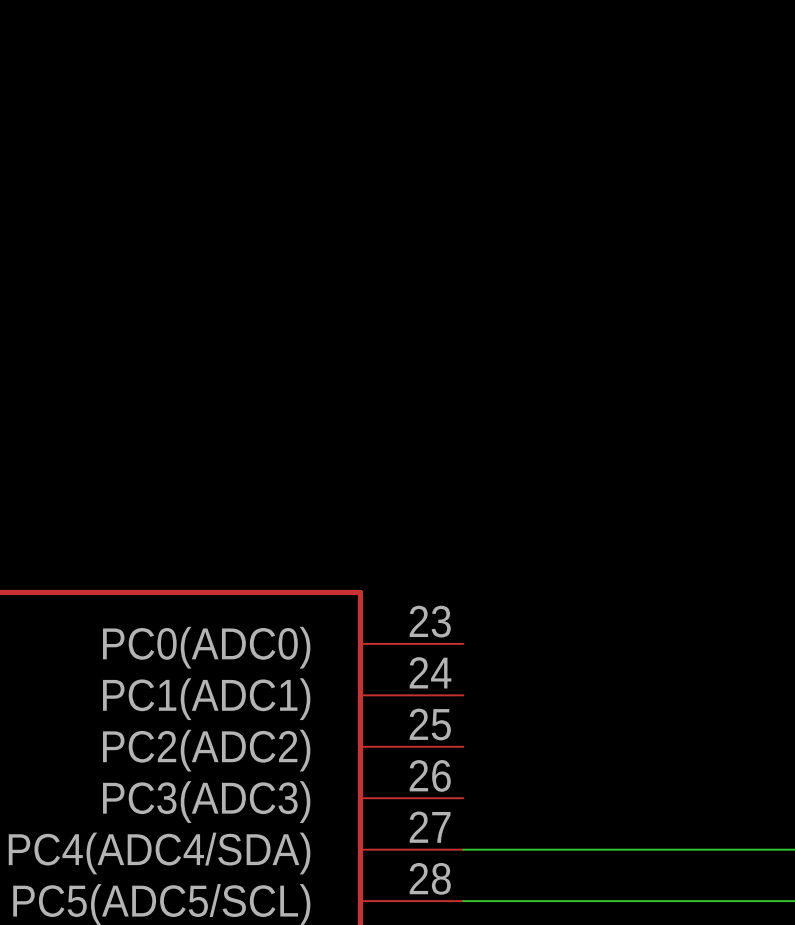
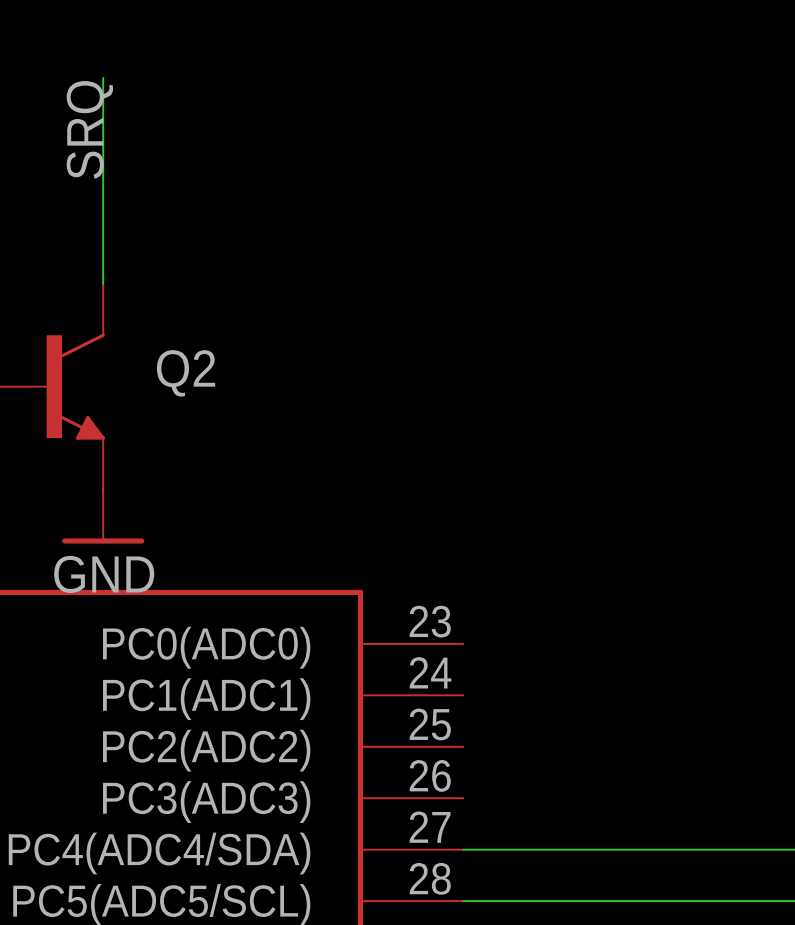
wire: none -> (103, 78) (103, 283)
label: none -> SRQ (89, 129)
Q2: none -> (52, 386)
power symbol: none -> GND (103, 516)

